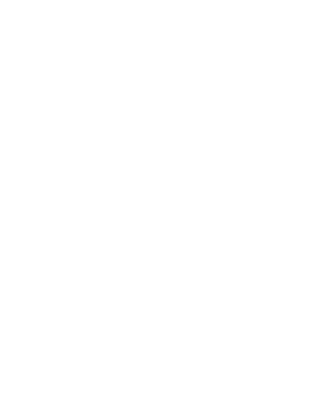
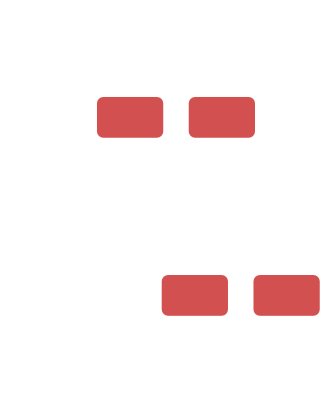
part: none -> (175, 117)
part: none -> (240, 295)

